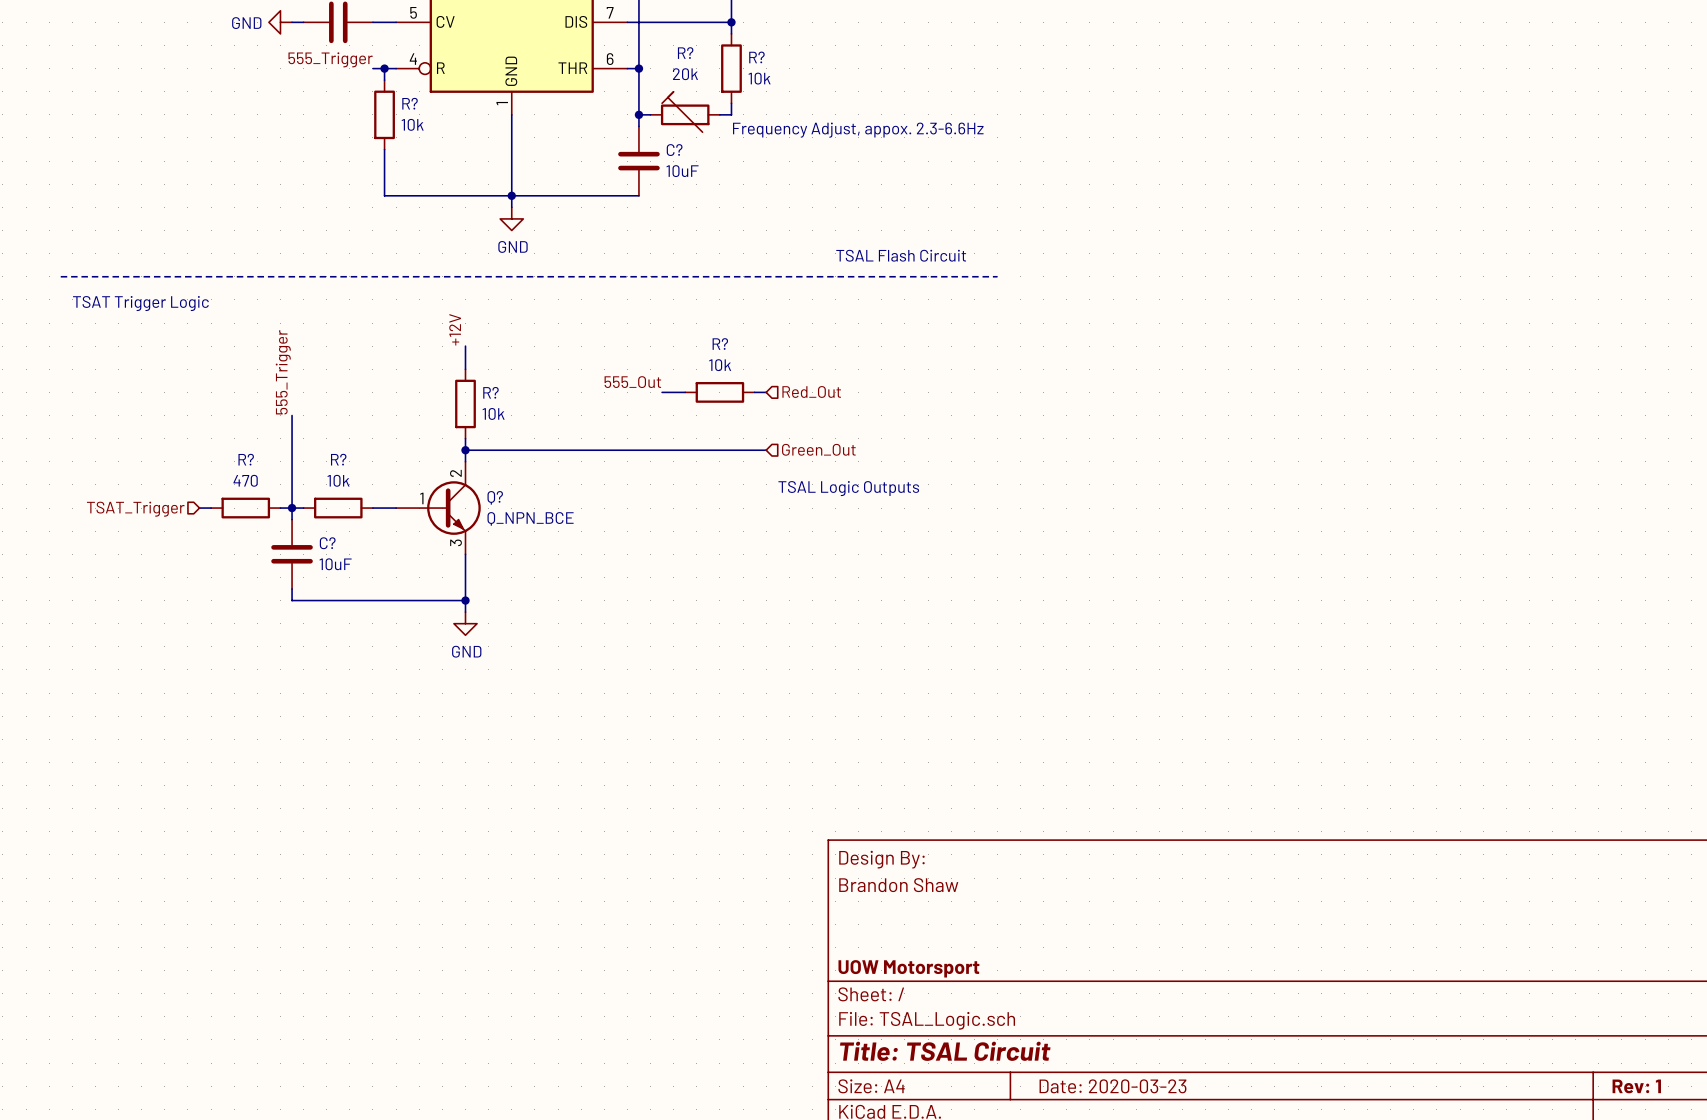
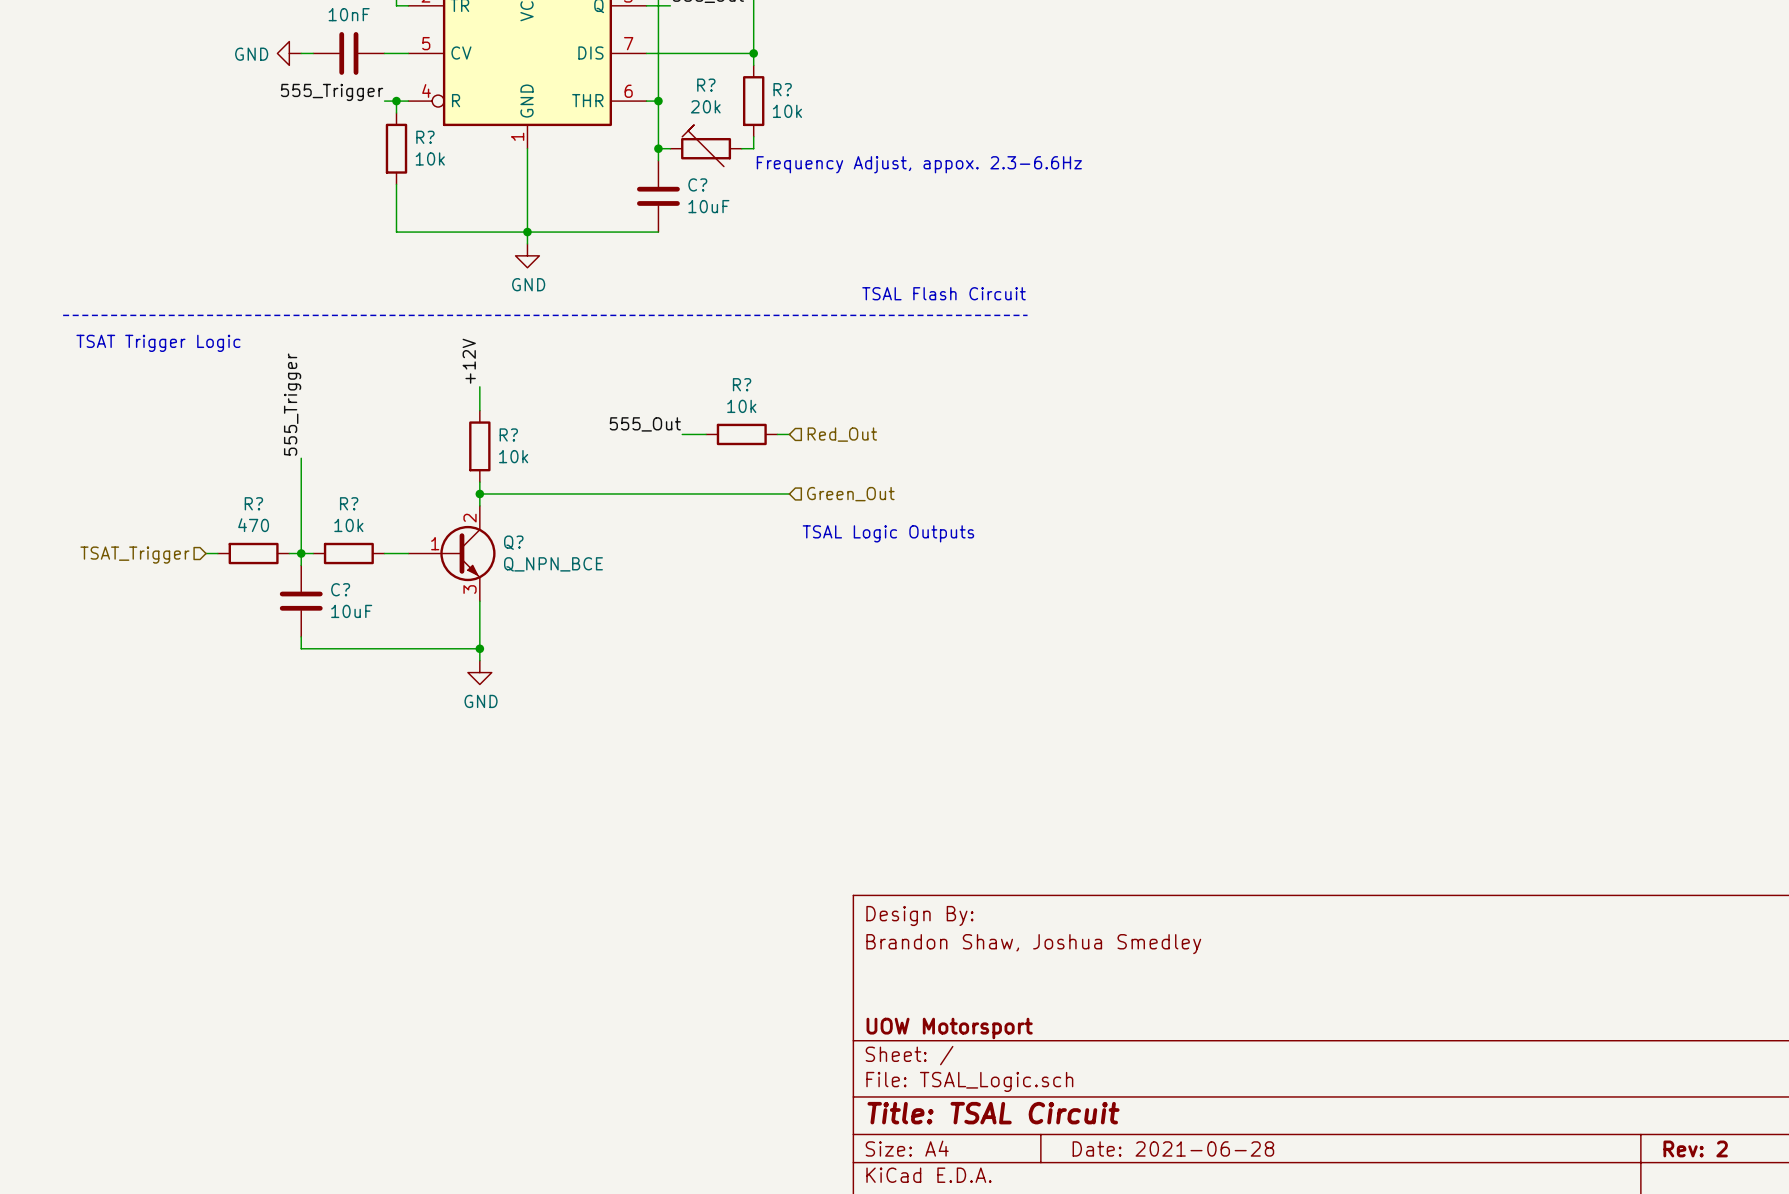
title block: Brandon Shaw (898, 885) -> Brandon Shaw, Joshua Smedley (1033, 944)
title block: Date: 2020-03-23 (1112, 1086) -> Date: 2021-06-28 (1173, 1148)
title block: Rev: 1 (1636, 1086) -> Rev: 2 (1695, 1148)

